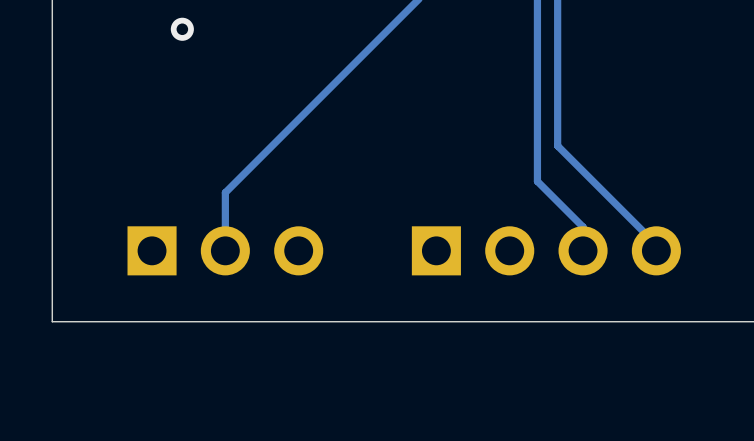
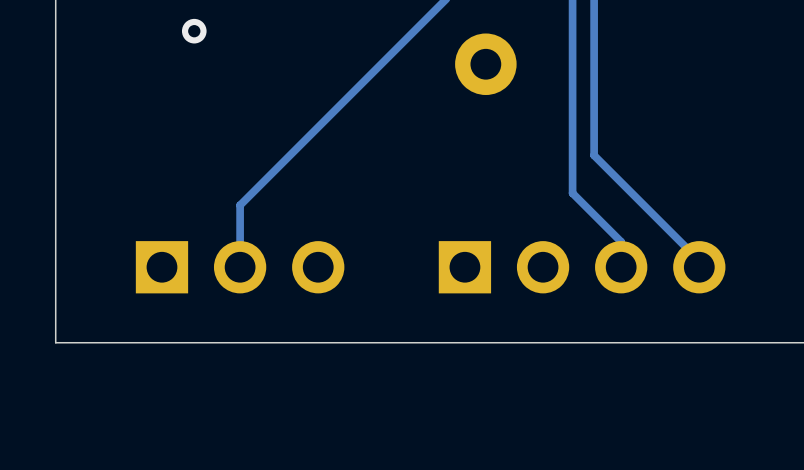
part: none -> (485, 64)

